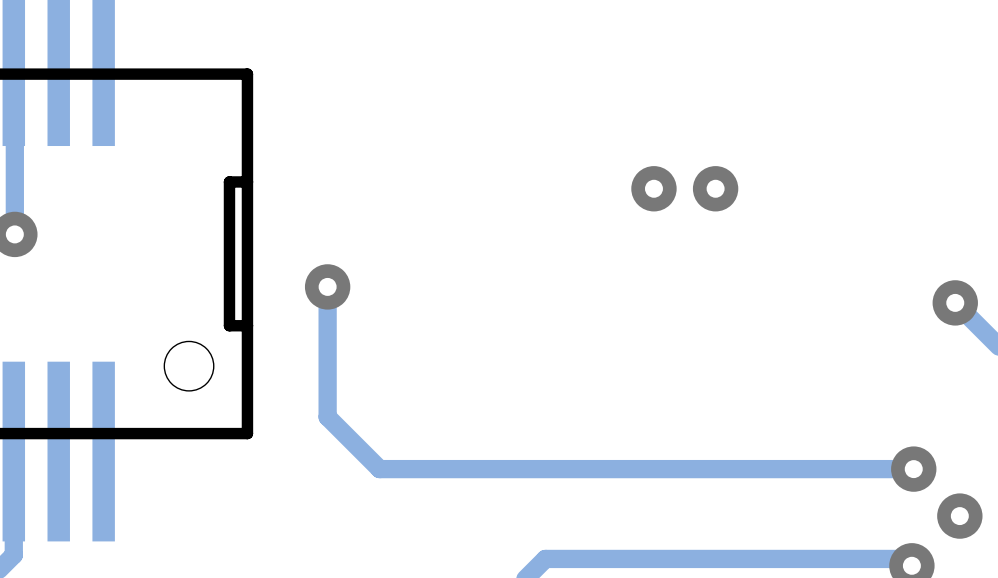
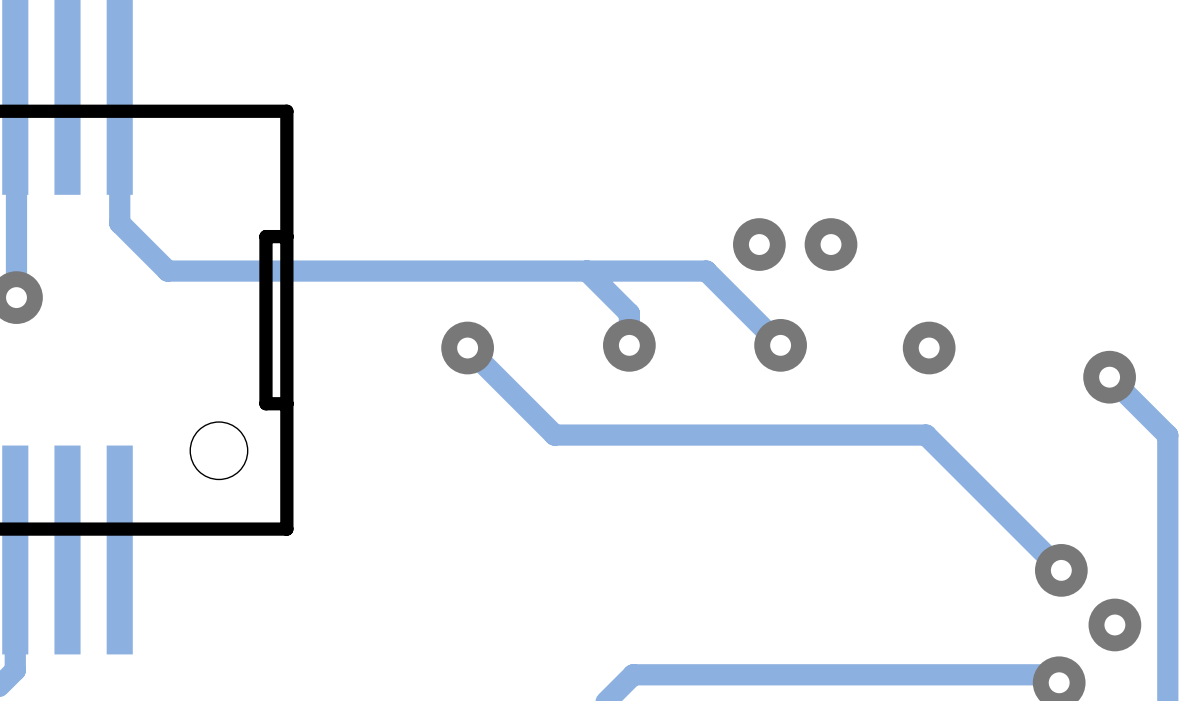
track: none -> (119, 90) (119, 223) (167, 271) (706, 271) (780, 345)
track: none -> (586, 271) (629, 313) (629, 345)
via: none -> (629, 345)
via: none -> (780, 345)
via: none -> (929, 348)
track: (327, 286) (327, 417) (379, 469) (913, 469) -> (467, 348) (554, 435) (926, 435) (1061, 570)
via position: (327, 286) -> (467, 348)

